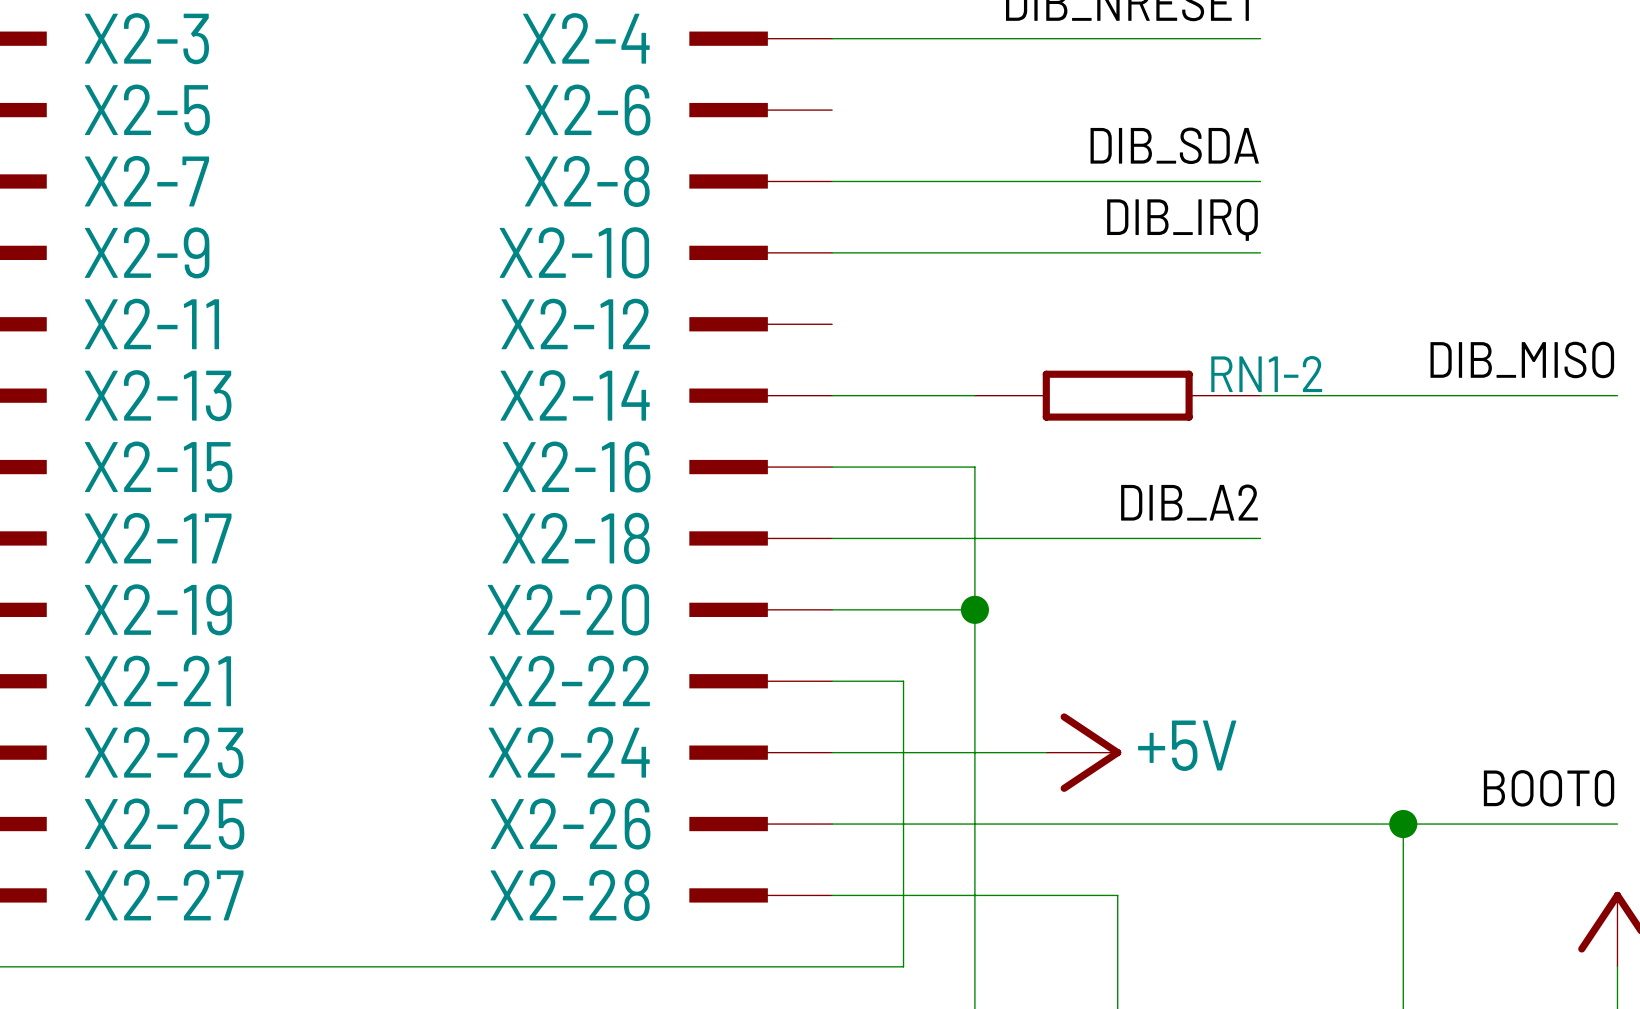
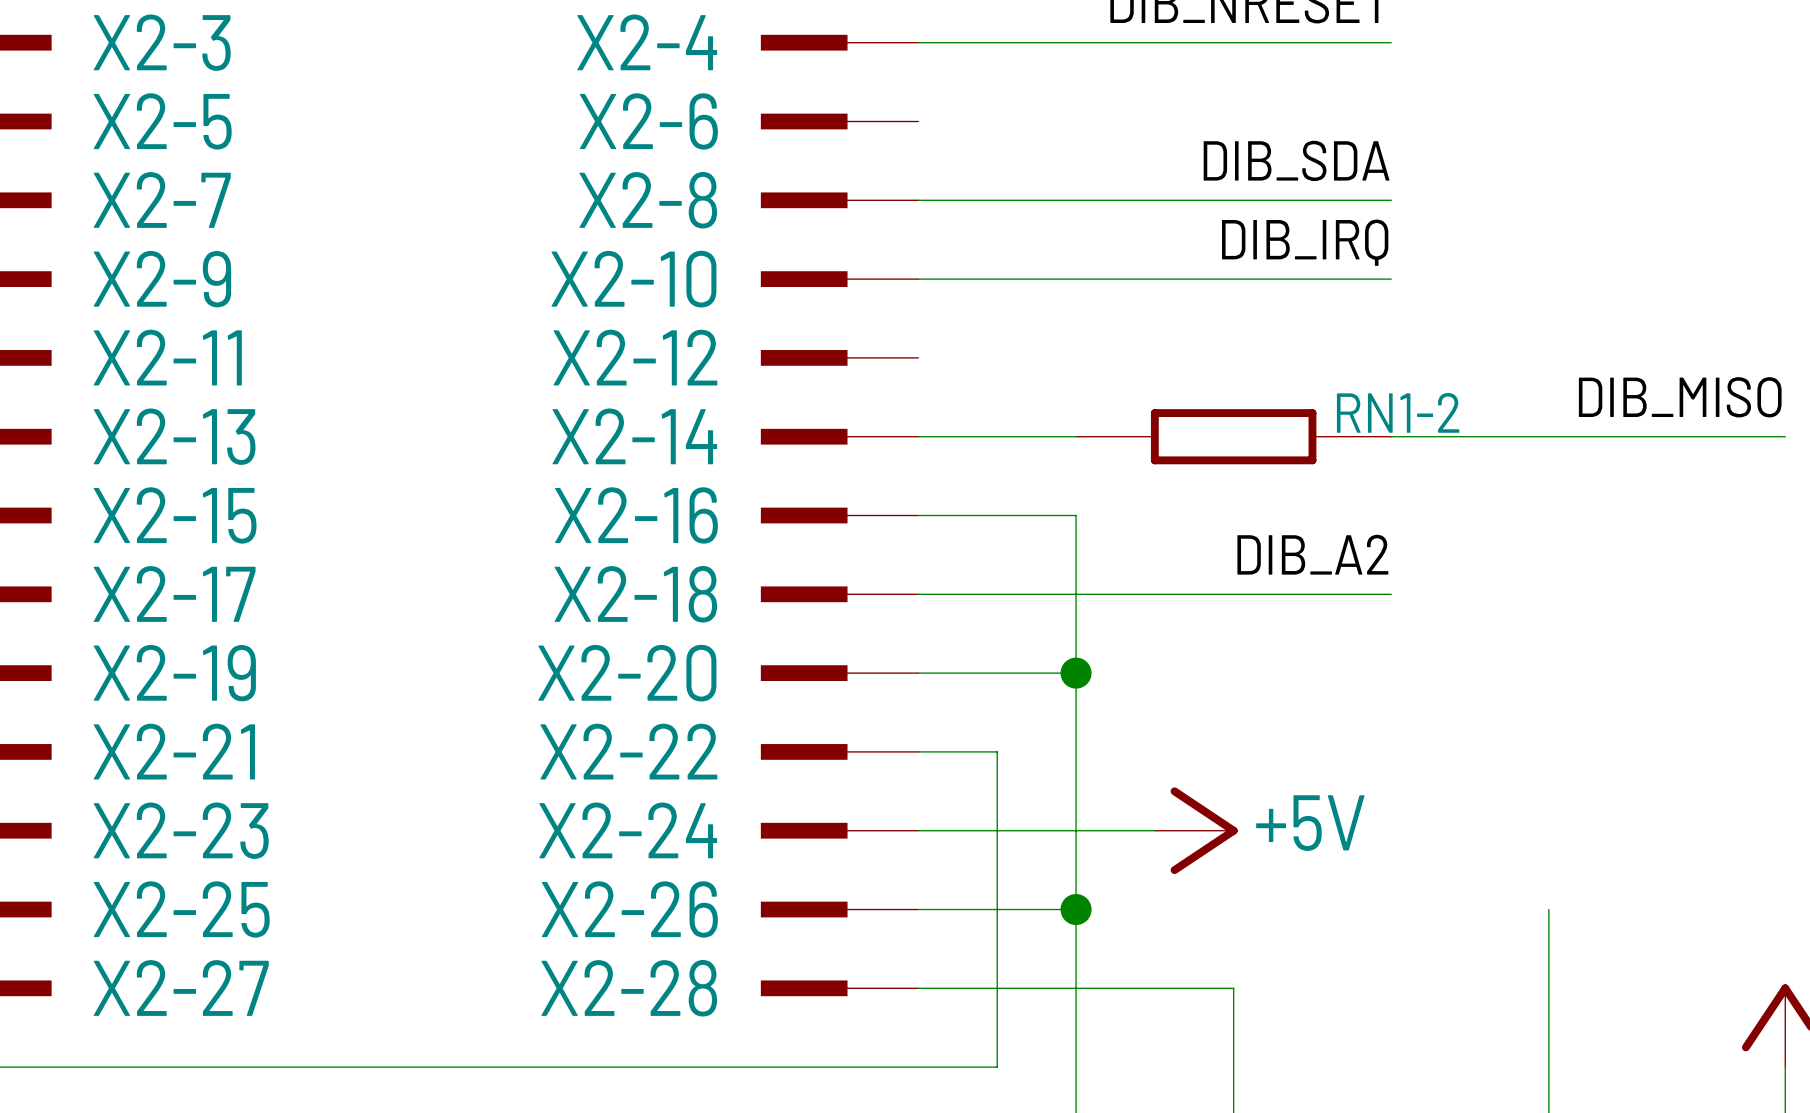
label: BOOT0 (1549, 788) -> none
wire: (974, 824) (1617, 824) -> none
junction: none -> (1076, 909)
junction: (1403, 824) -> none

